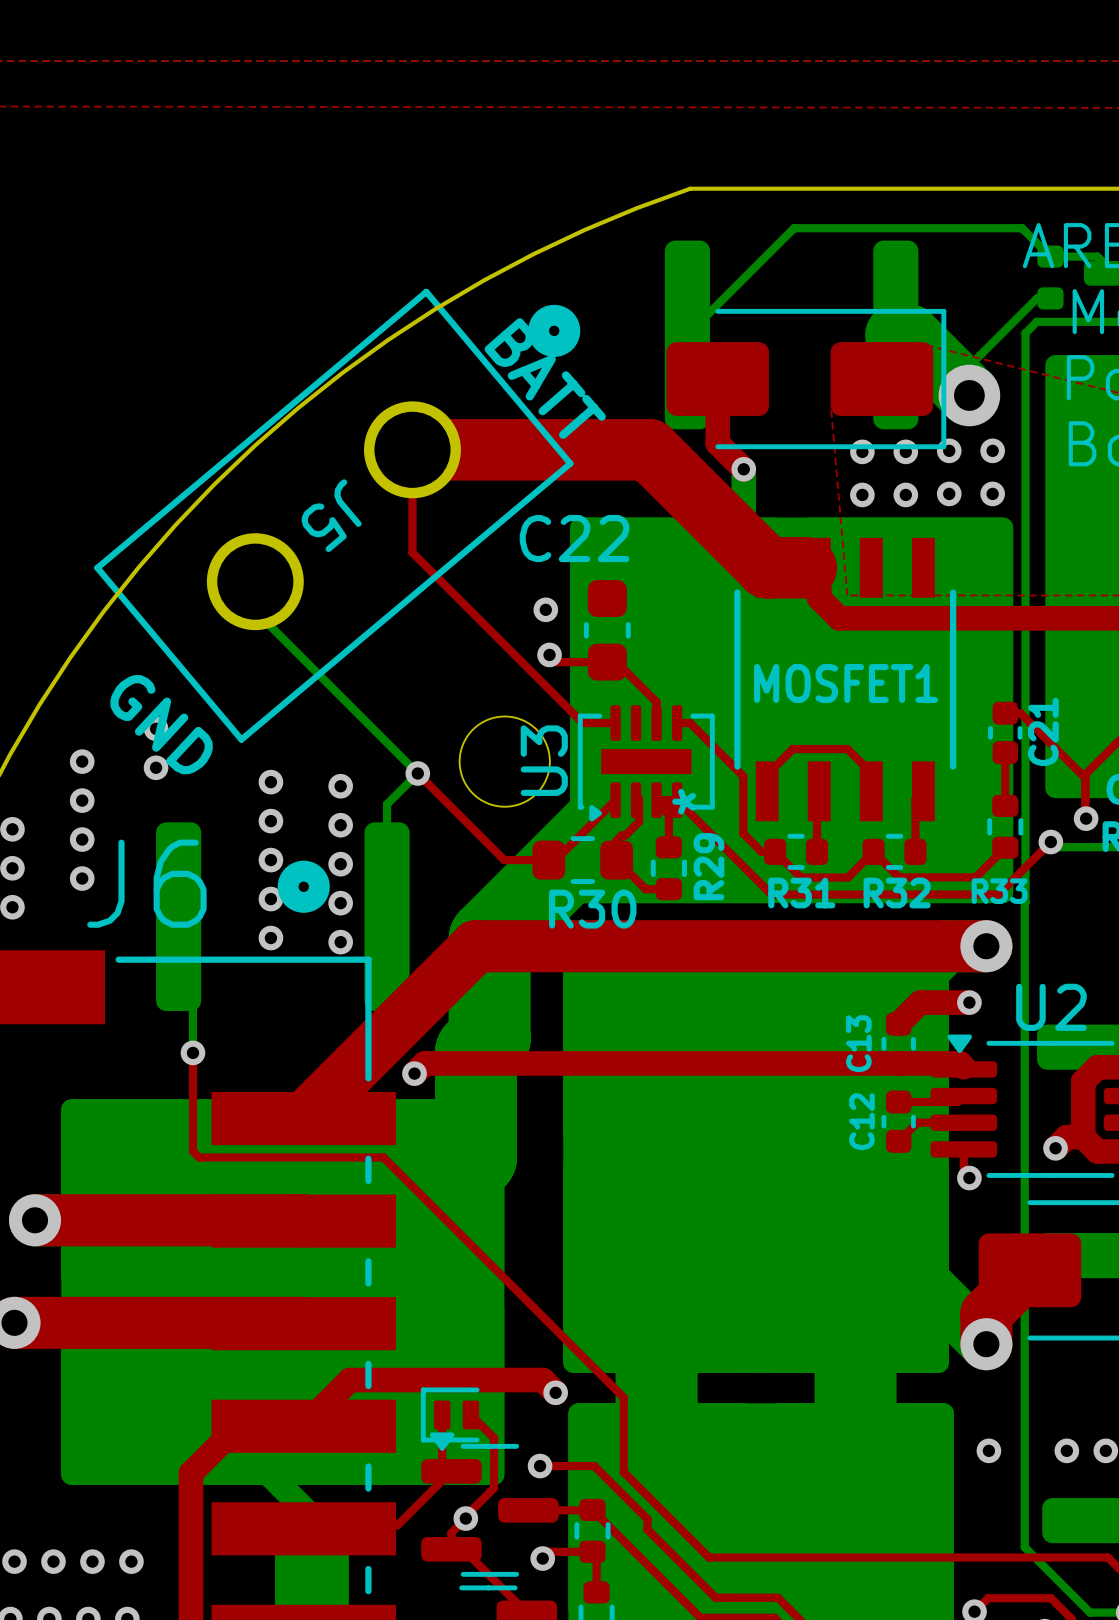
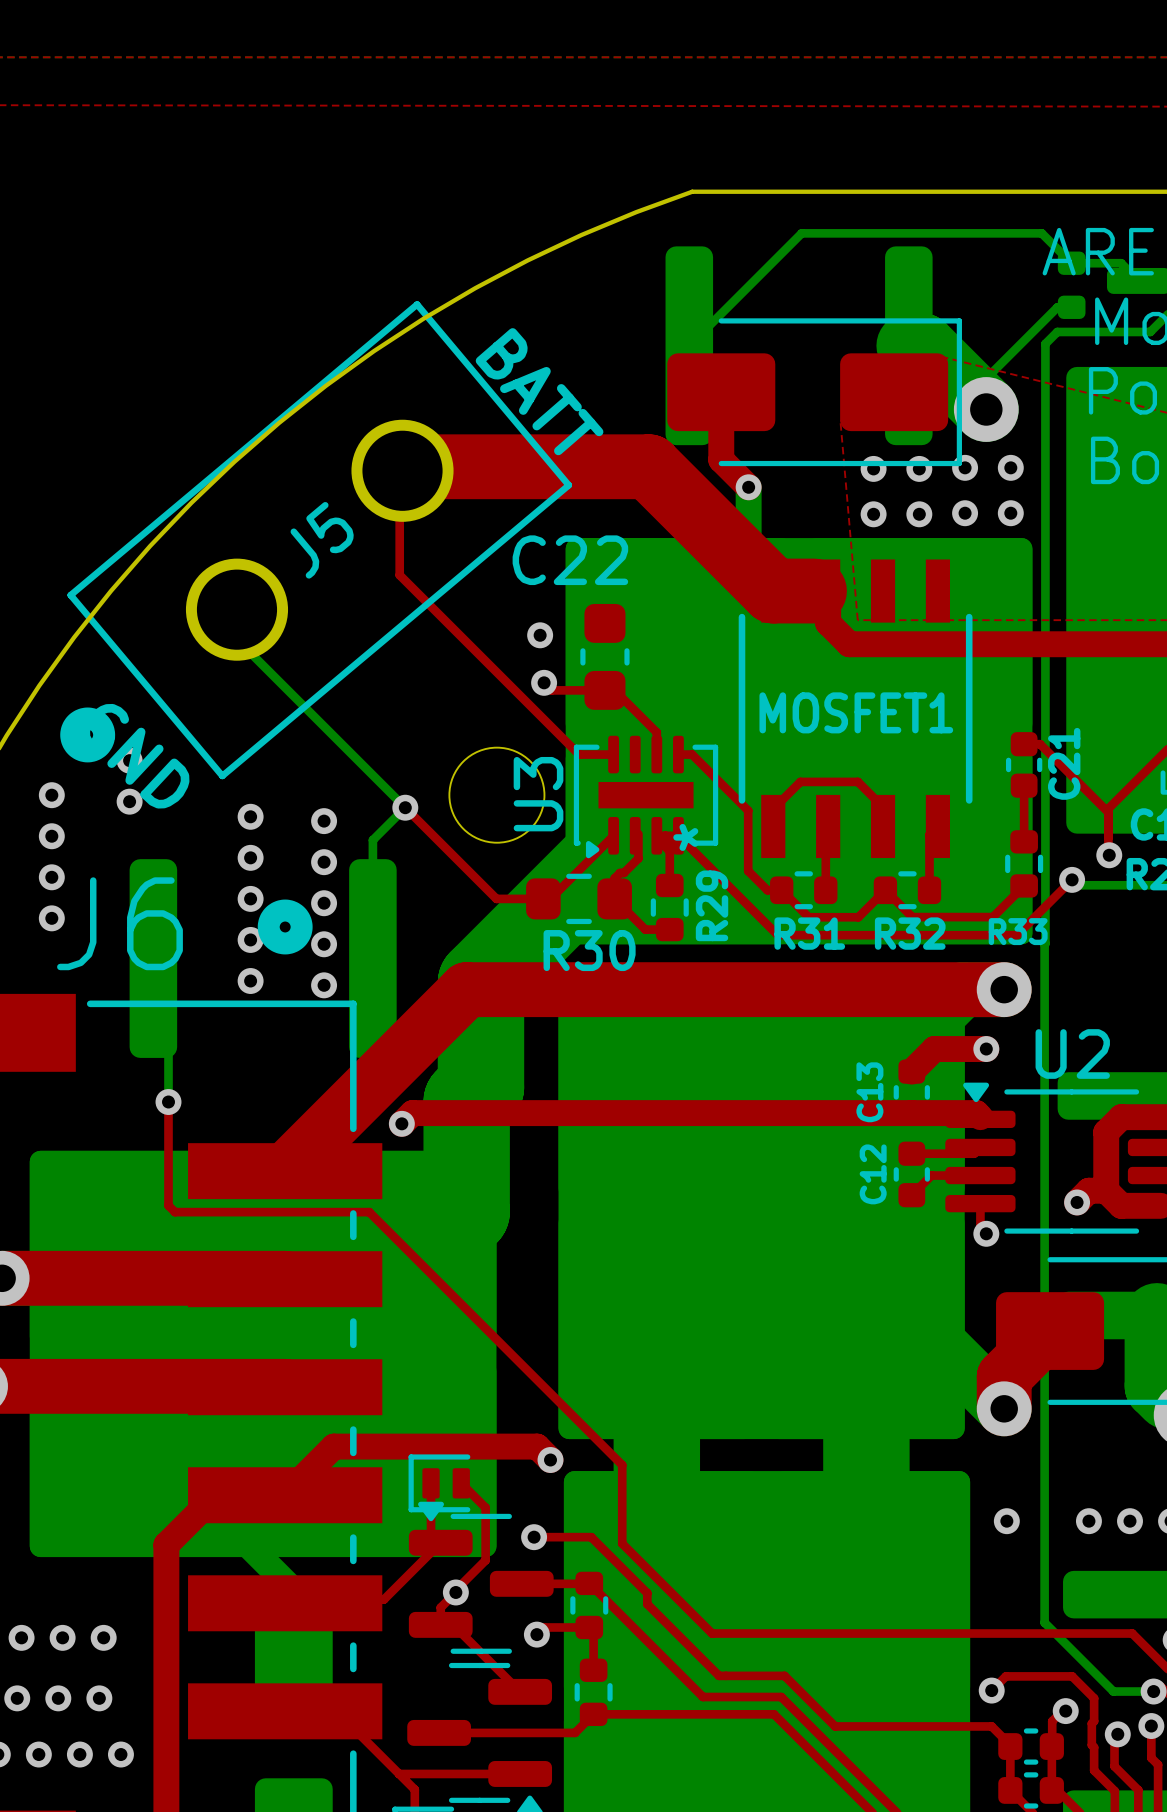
J5 rotation: 0° (337, 515) -> 180° (316, 540)

